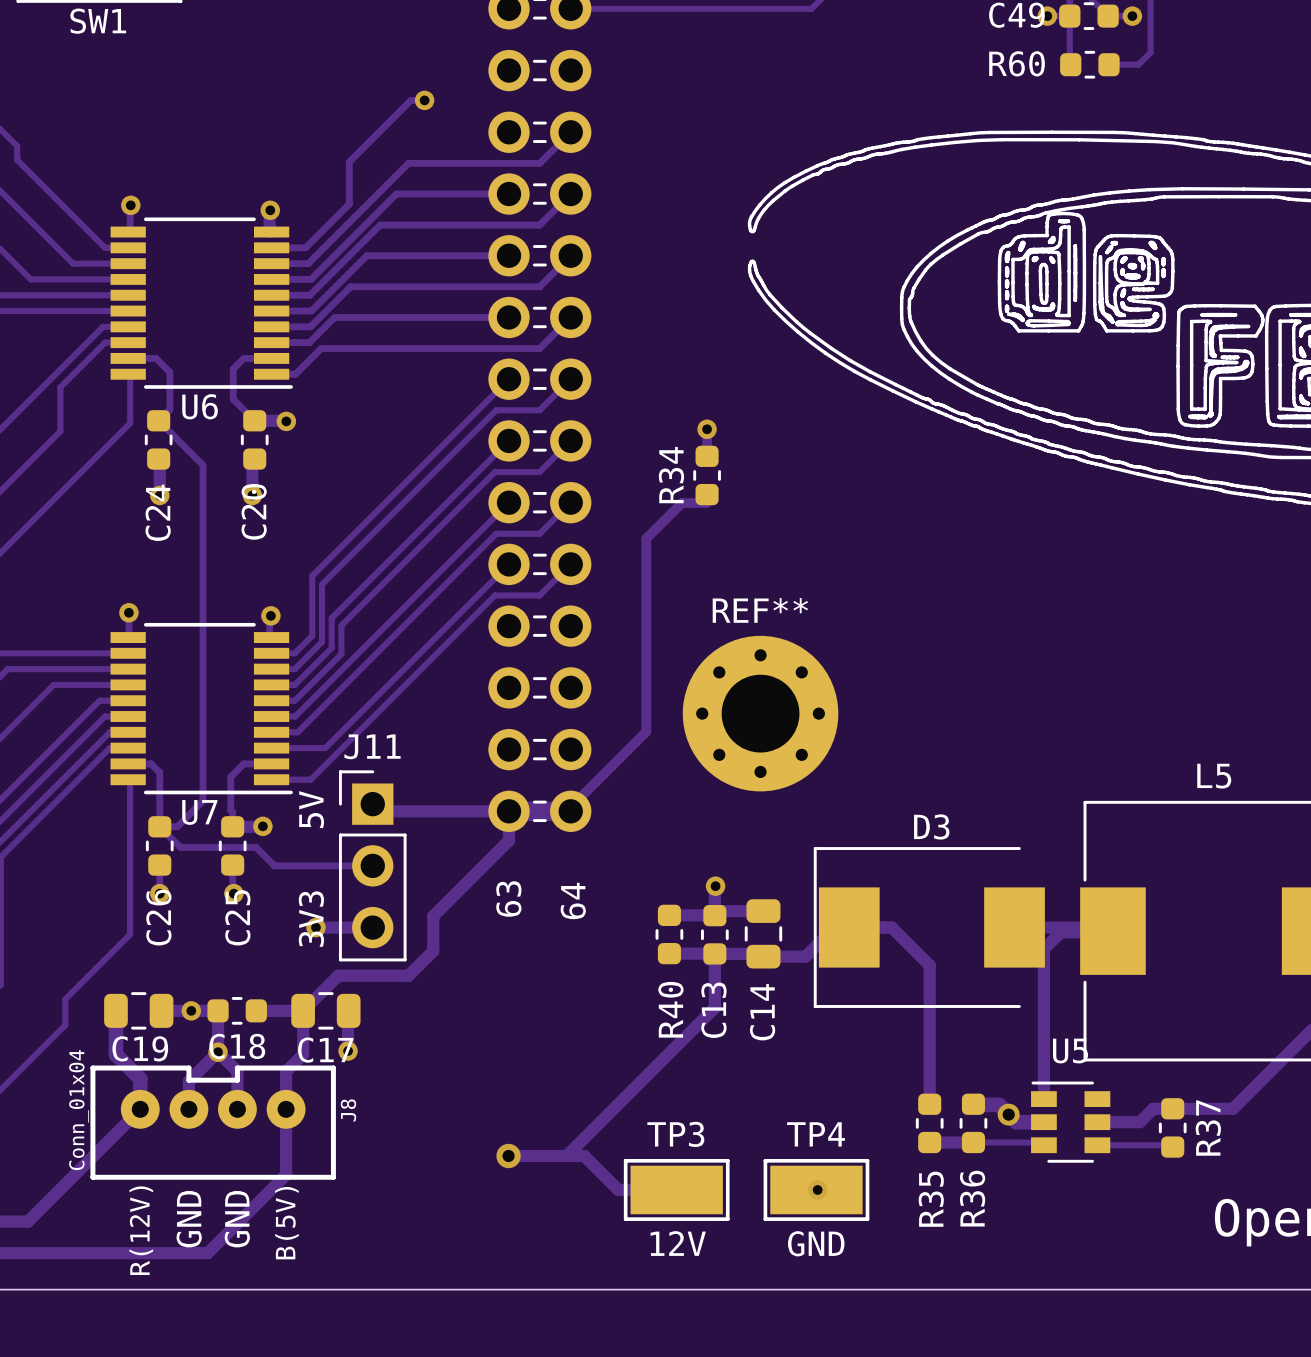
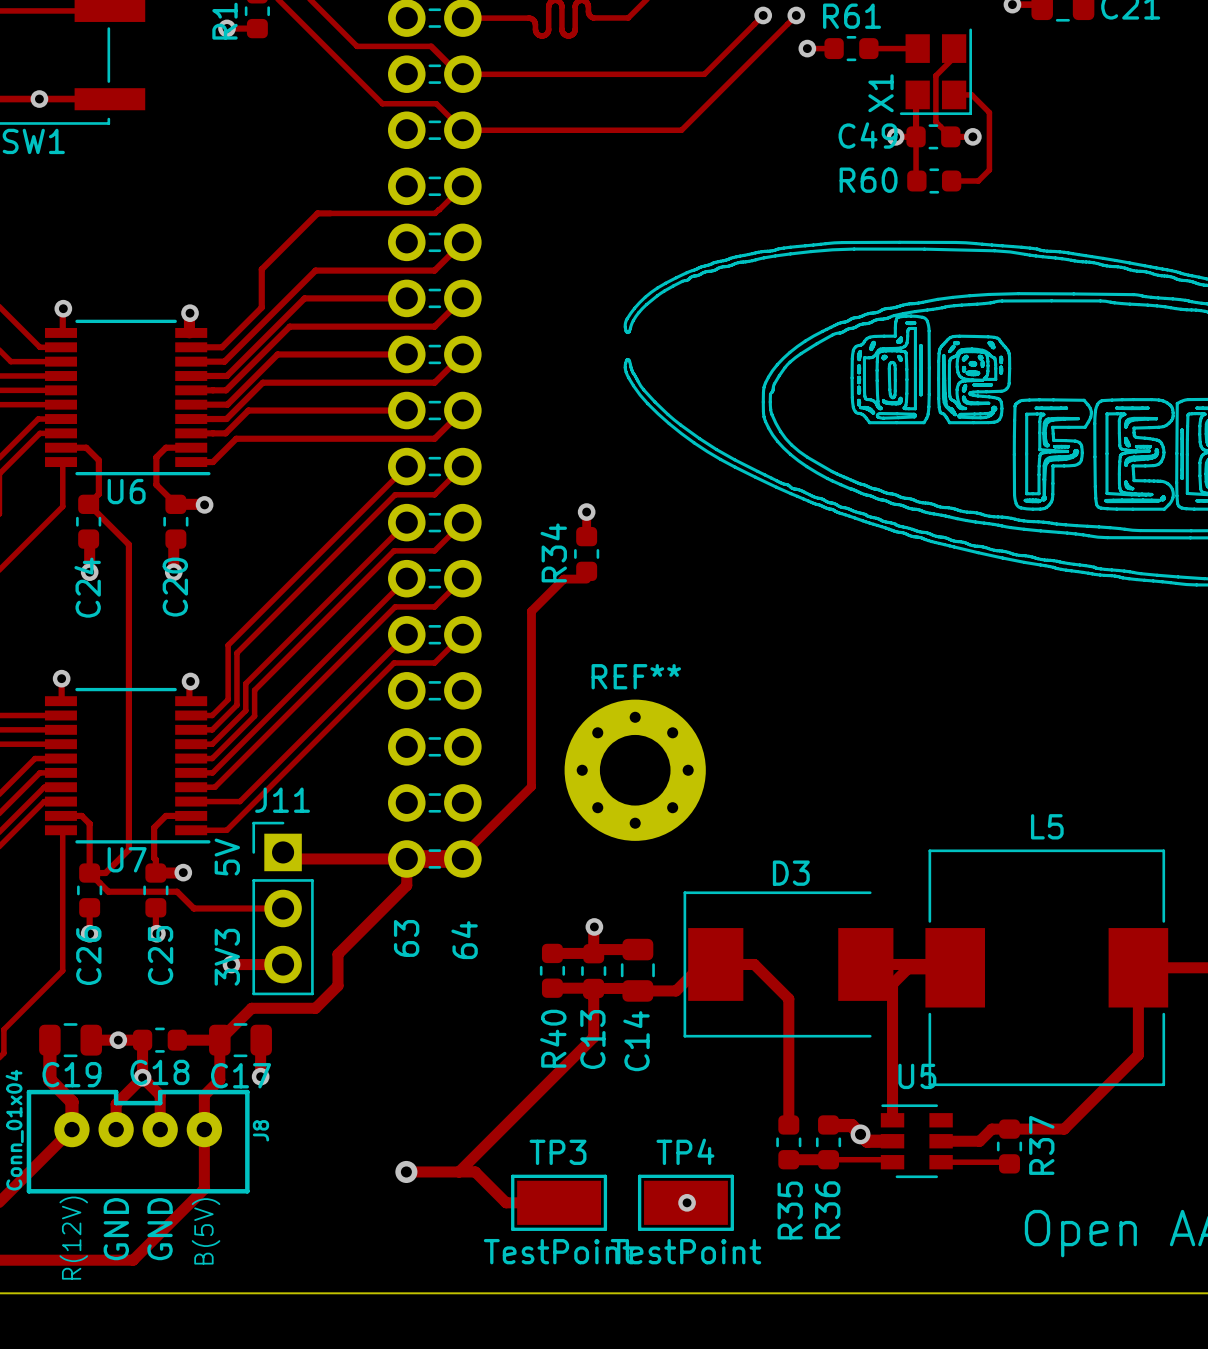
track: none -> (462, 186) (435, 213) (330, 213)
via: (424, 100) -> none
TP3 value: 12V (678, 1243) -> TestPoint (559, 1251)
TP4 value: GND (816, 1243) -> TestPoint (685, 1251)

